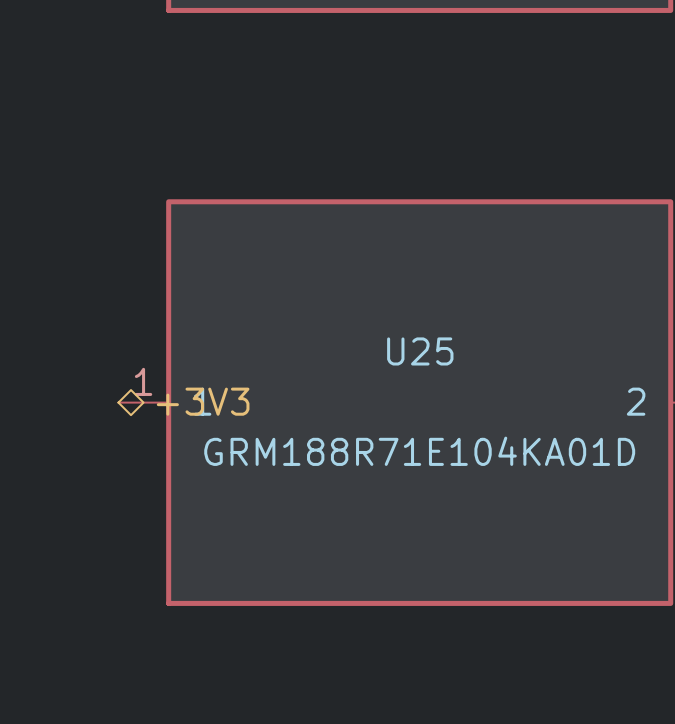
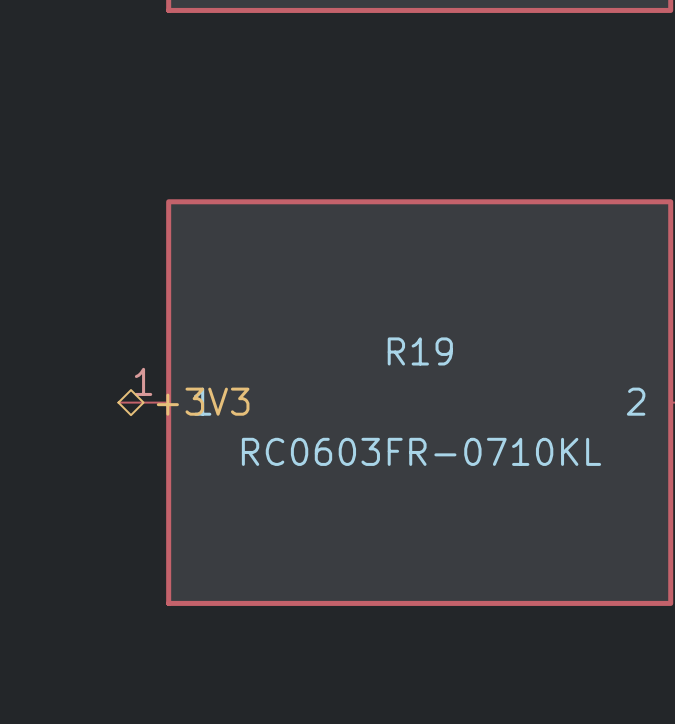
U25 name: U25 (420, 351) -> R19 (420, 351)
U25 value: GRM188R71E104KA01D (419, 451) -> RC0603FR-0710KL (421, 451)

